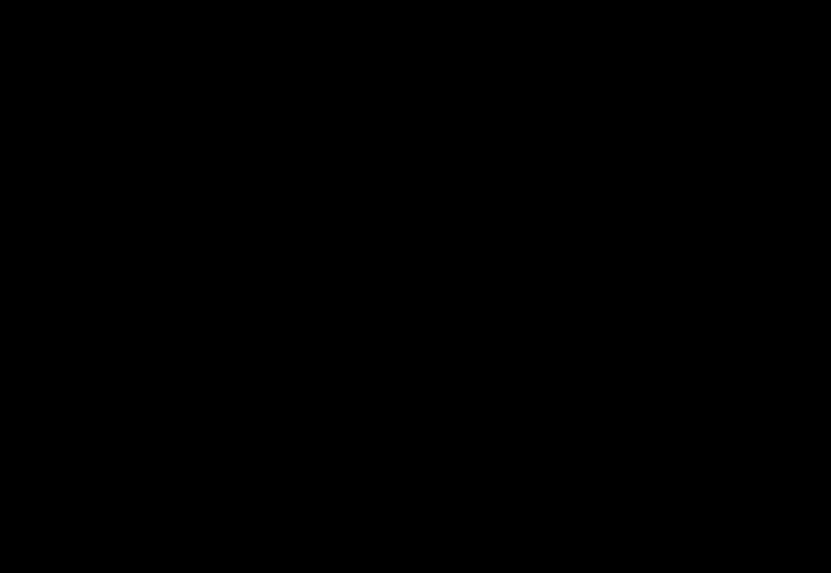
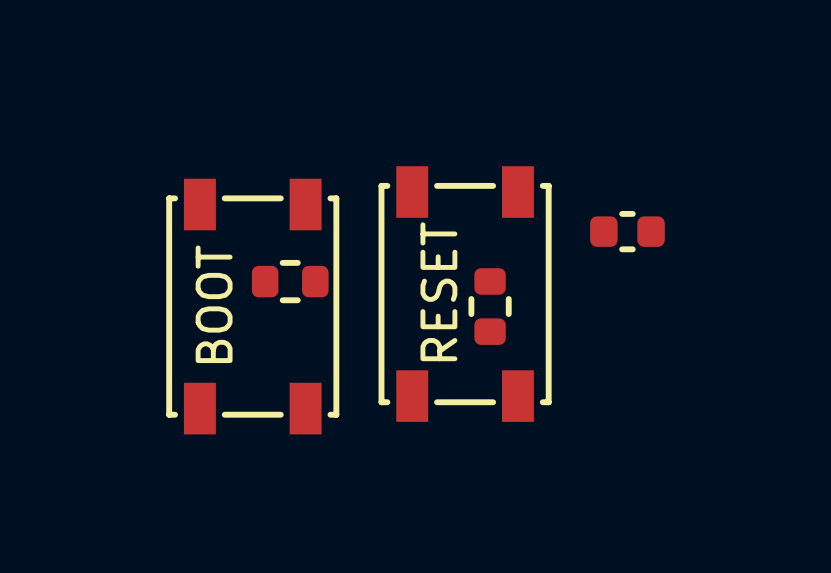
part: none -> (627, 231)
part: none -> (290, 281)
text: none -> RESET (438, 291)
part: none -> (465, 294)
text: none -> BOOT (214, 304)
part: none -> (252, 306)
part: none -> (490, 306)

